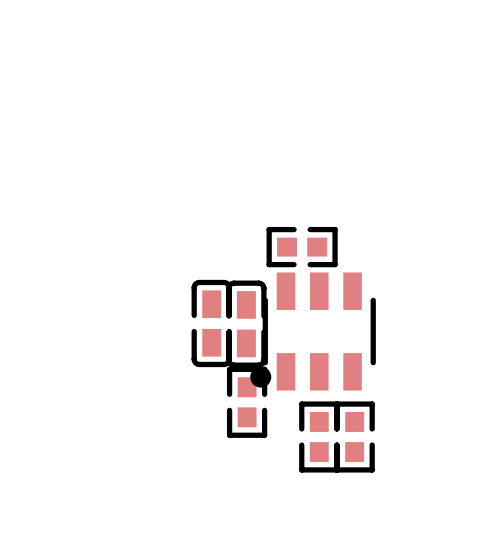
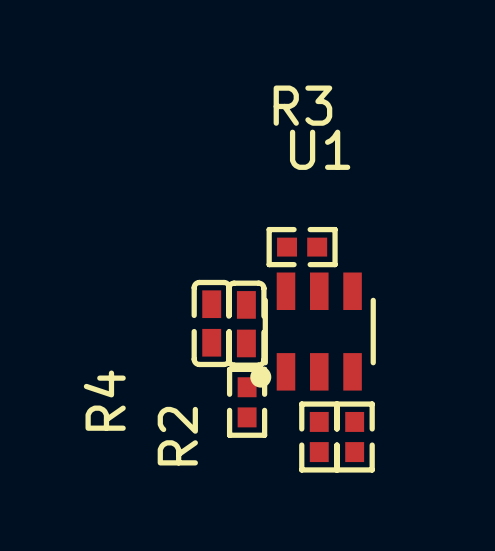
R3 name: none -> R3 (302, 105)
U1 name: none -> U1 (320, 149)
R4 name: none -> R4 (104, 400)
R2 name: none -> R2 (177, 436)

